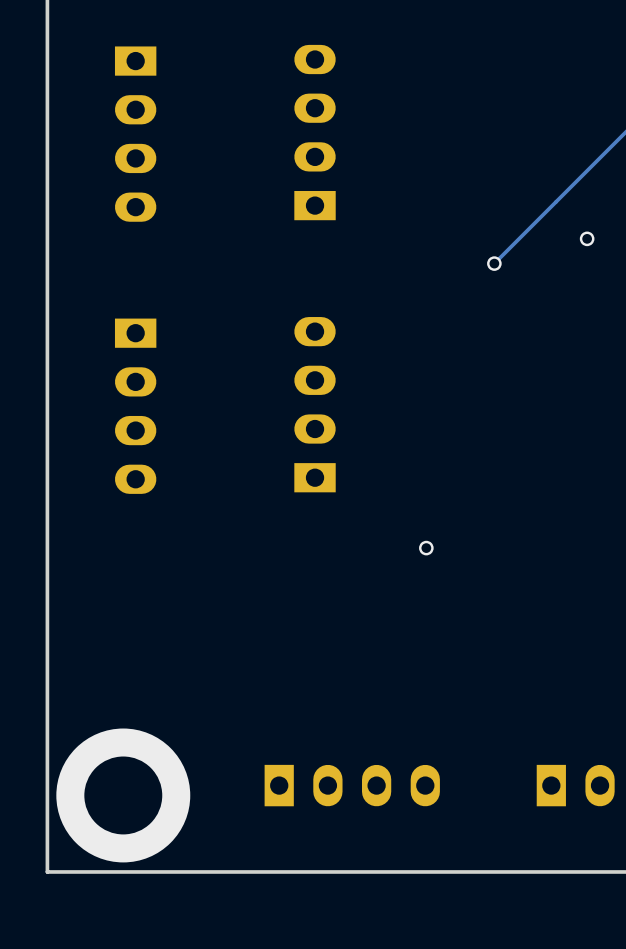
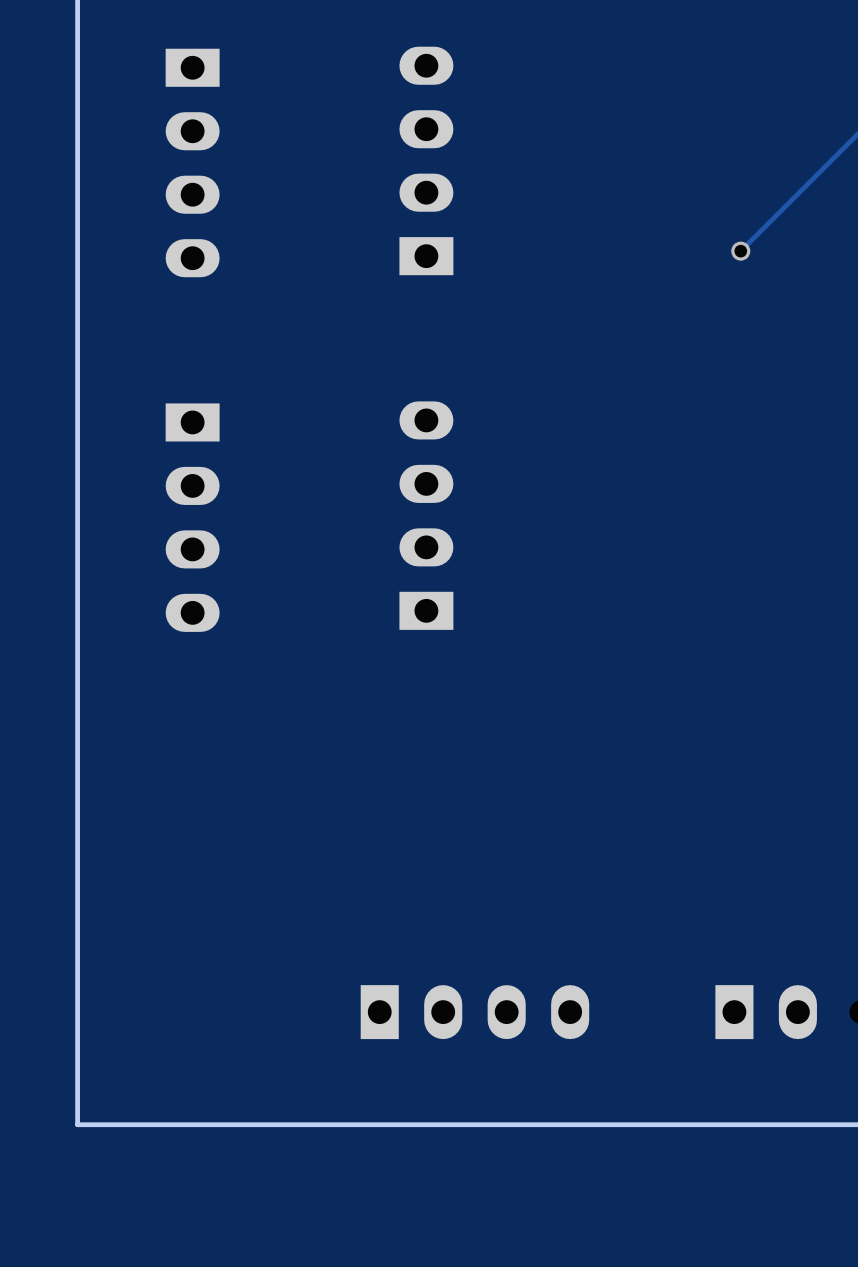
track: (556, 201) (494, 263) -> none
via: none -> (740, 251)
via: (587, 238) -> none
via: (494, 263) -> none
via: (426, 548) -> none
via: (123, 795) -> none

